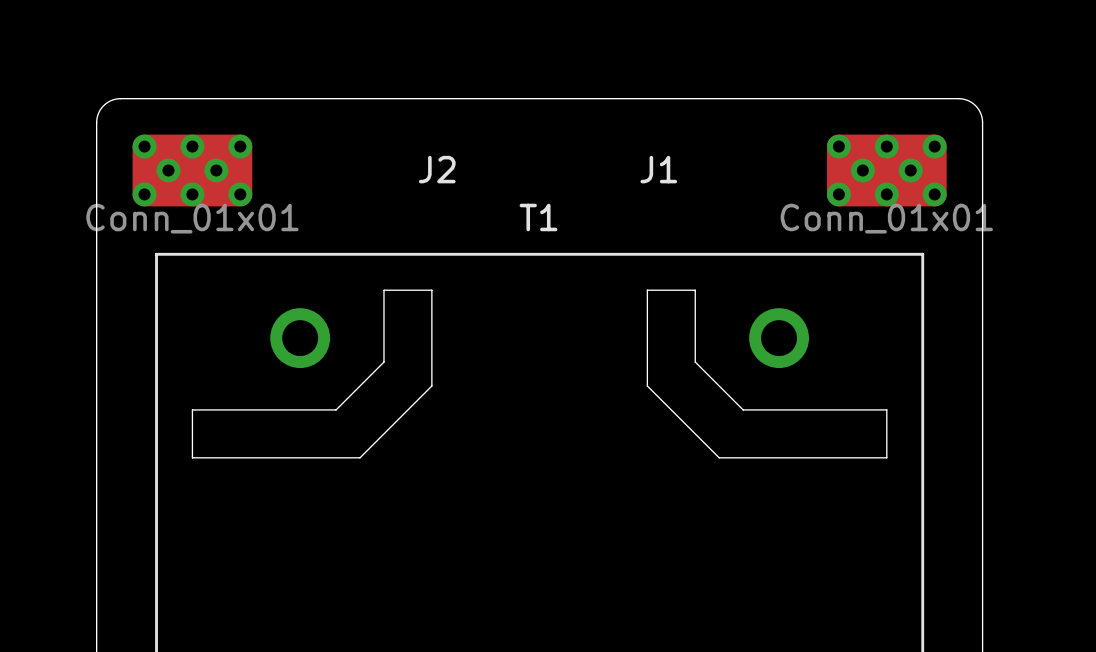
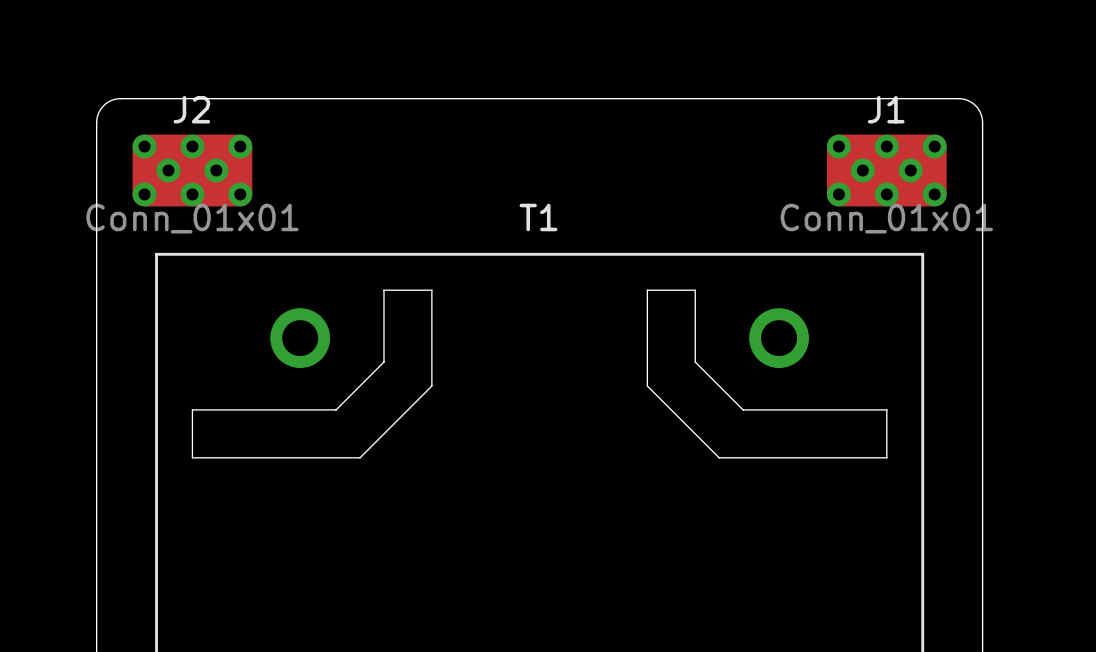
J2 name position: J2 (437, 169) -> J2 (191, 109)
J1 name position: J1 (658, 169) -> J1 (886, 109)

